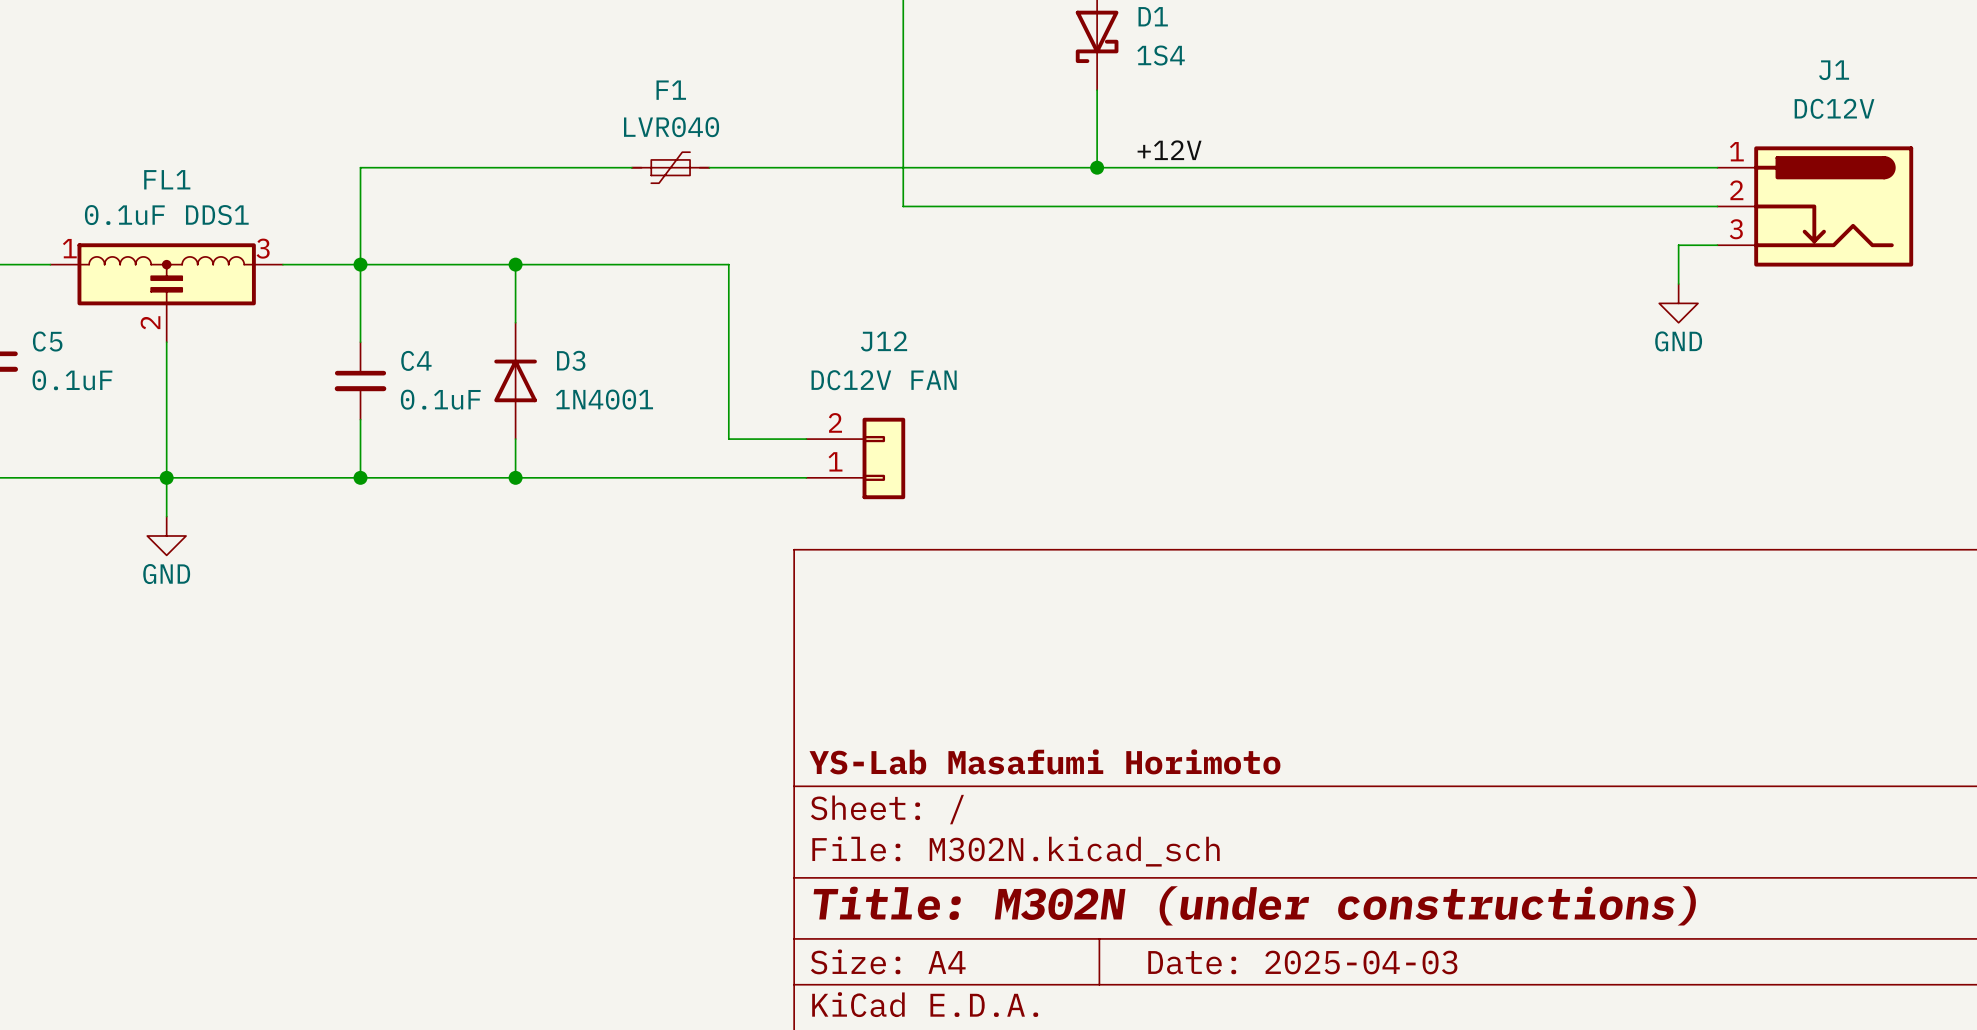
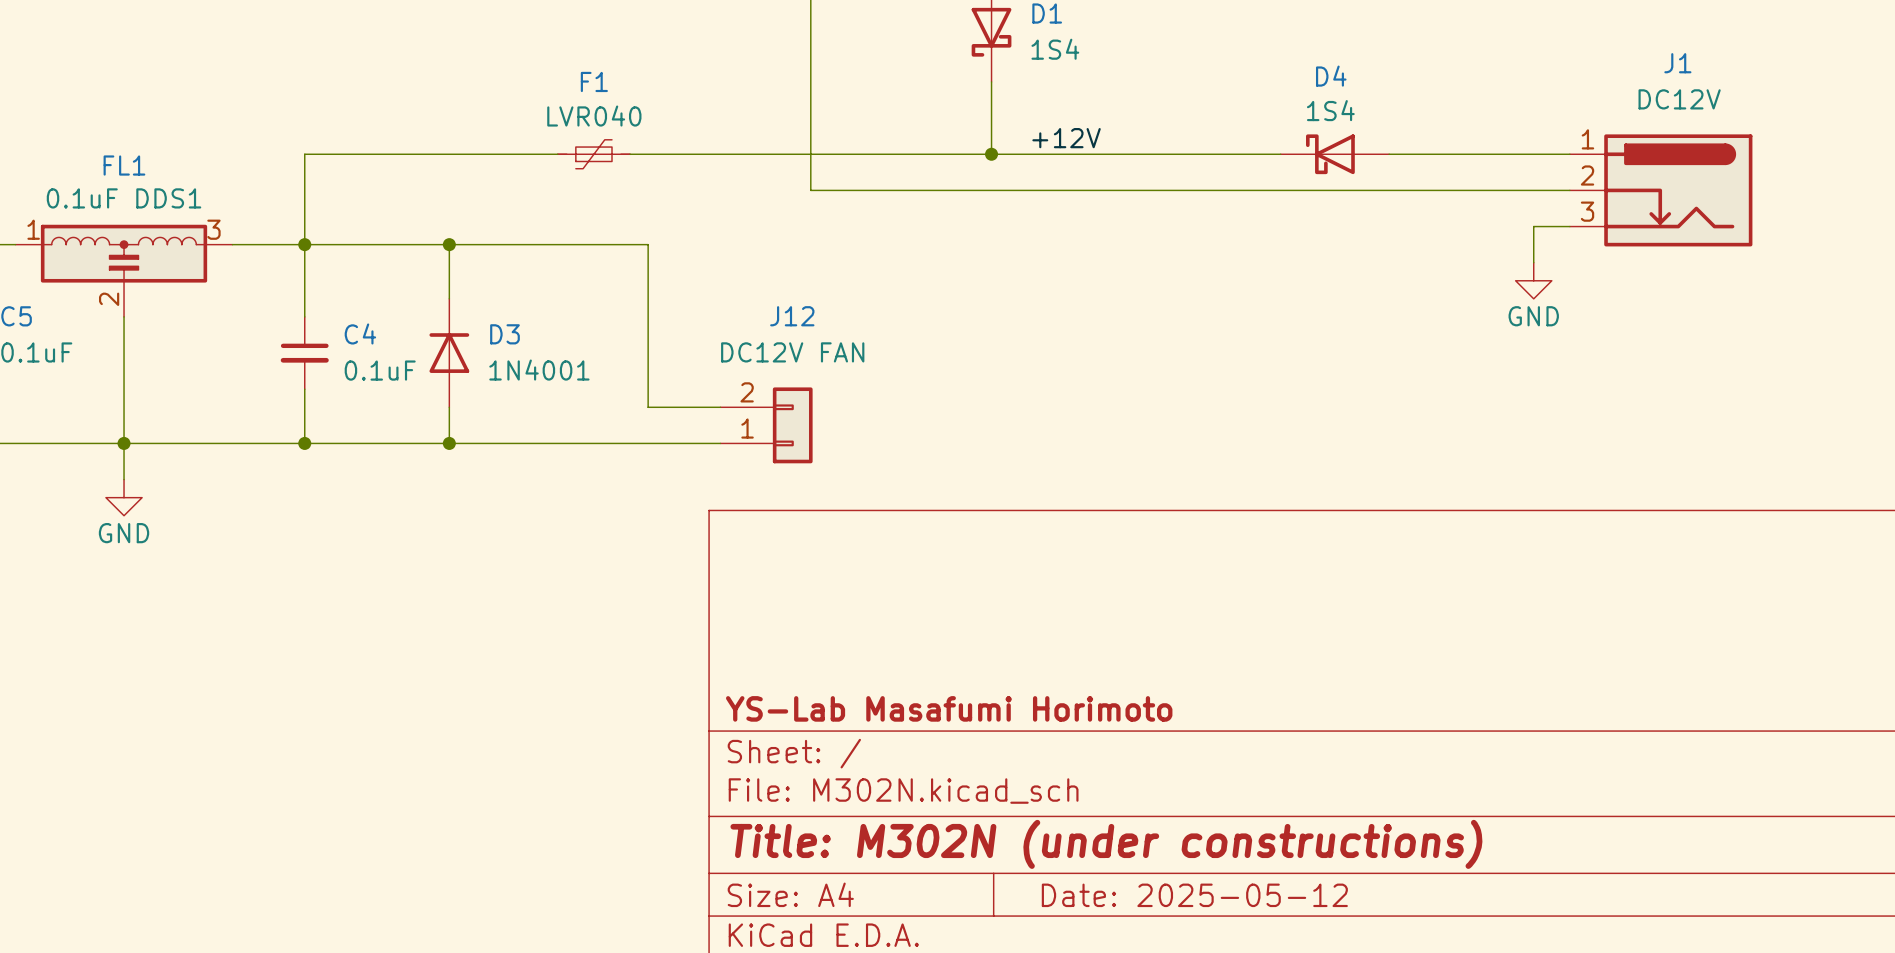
D4: none -> 1S4 (1334, 154)
title block: Date: 2025-04-03 (1302, 962) -> Date: 2025-05-12 (1194, 895)

